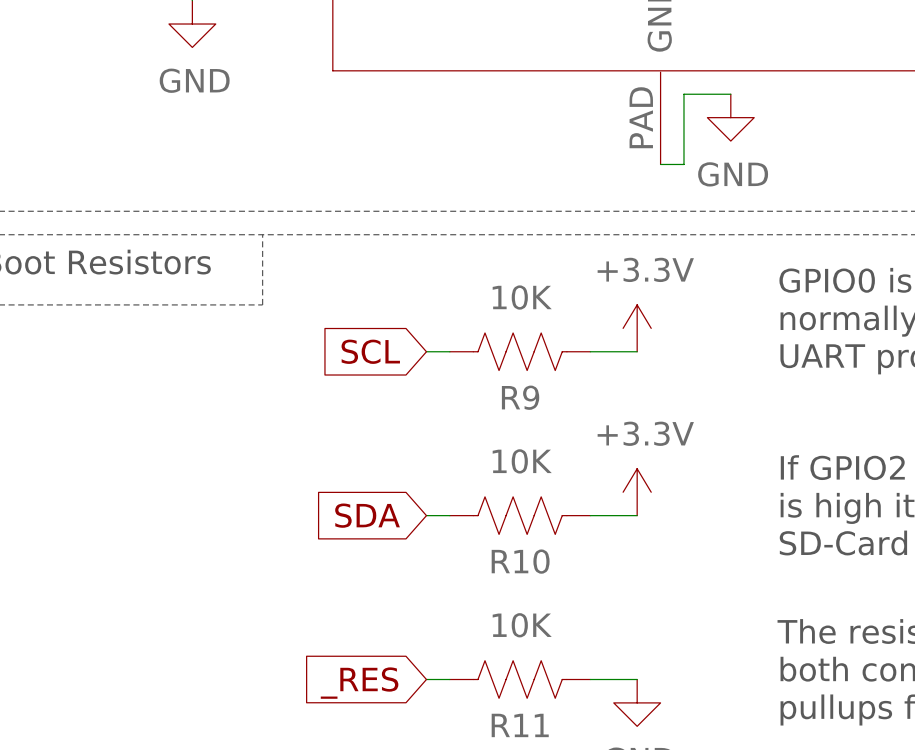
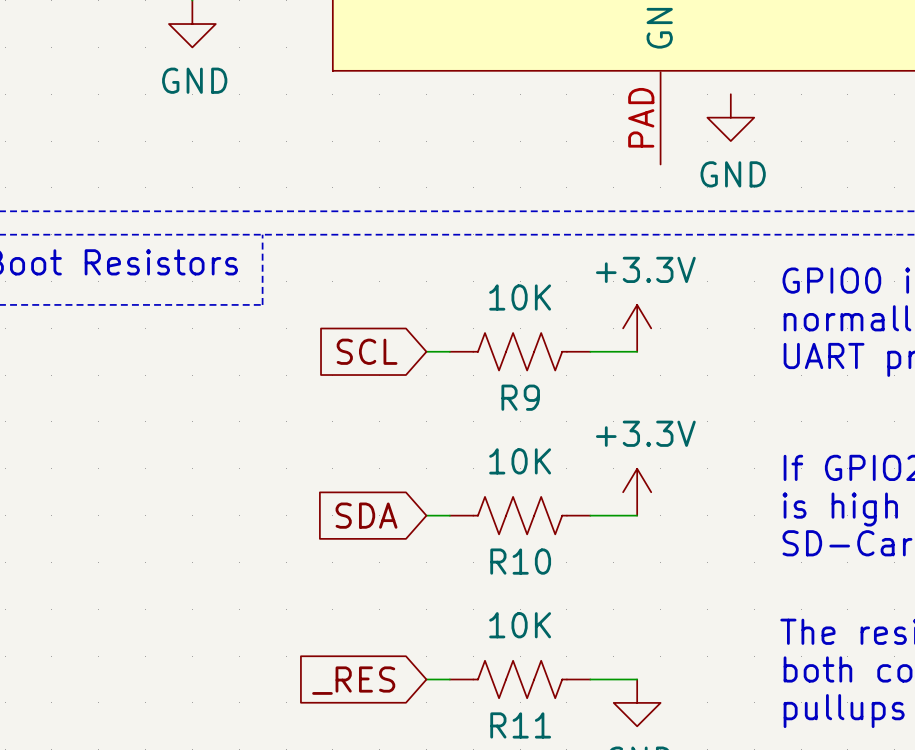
wire: (730, 94) (683, 94) (683, 164) (660, 164) -> none

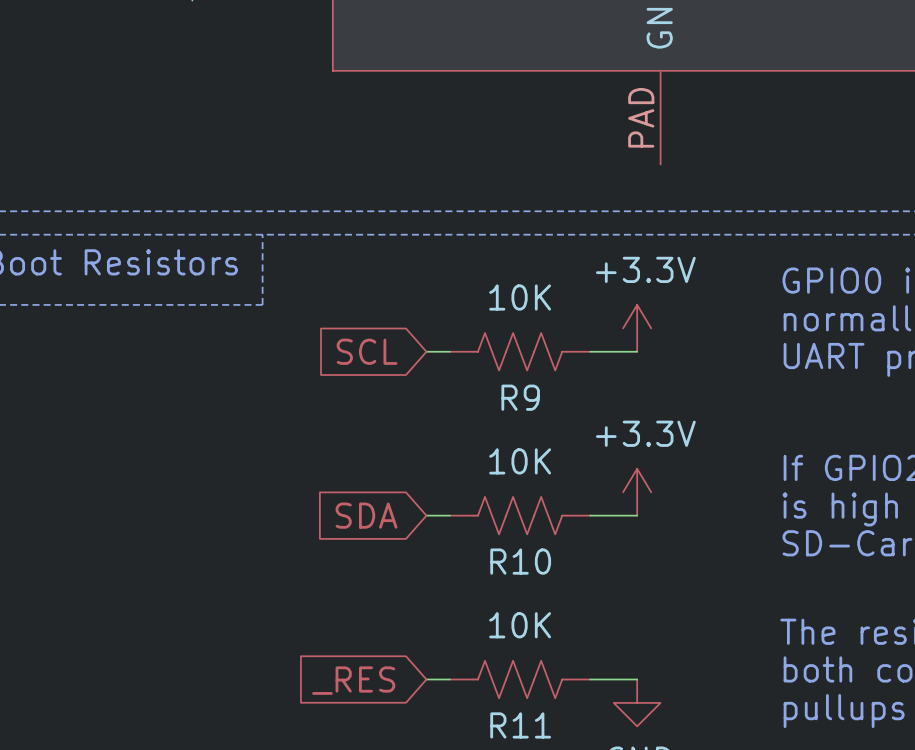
power symbol: GND (192, 24) -> none
power symbol: GND (730, 117) -> none

